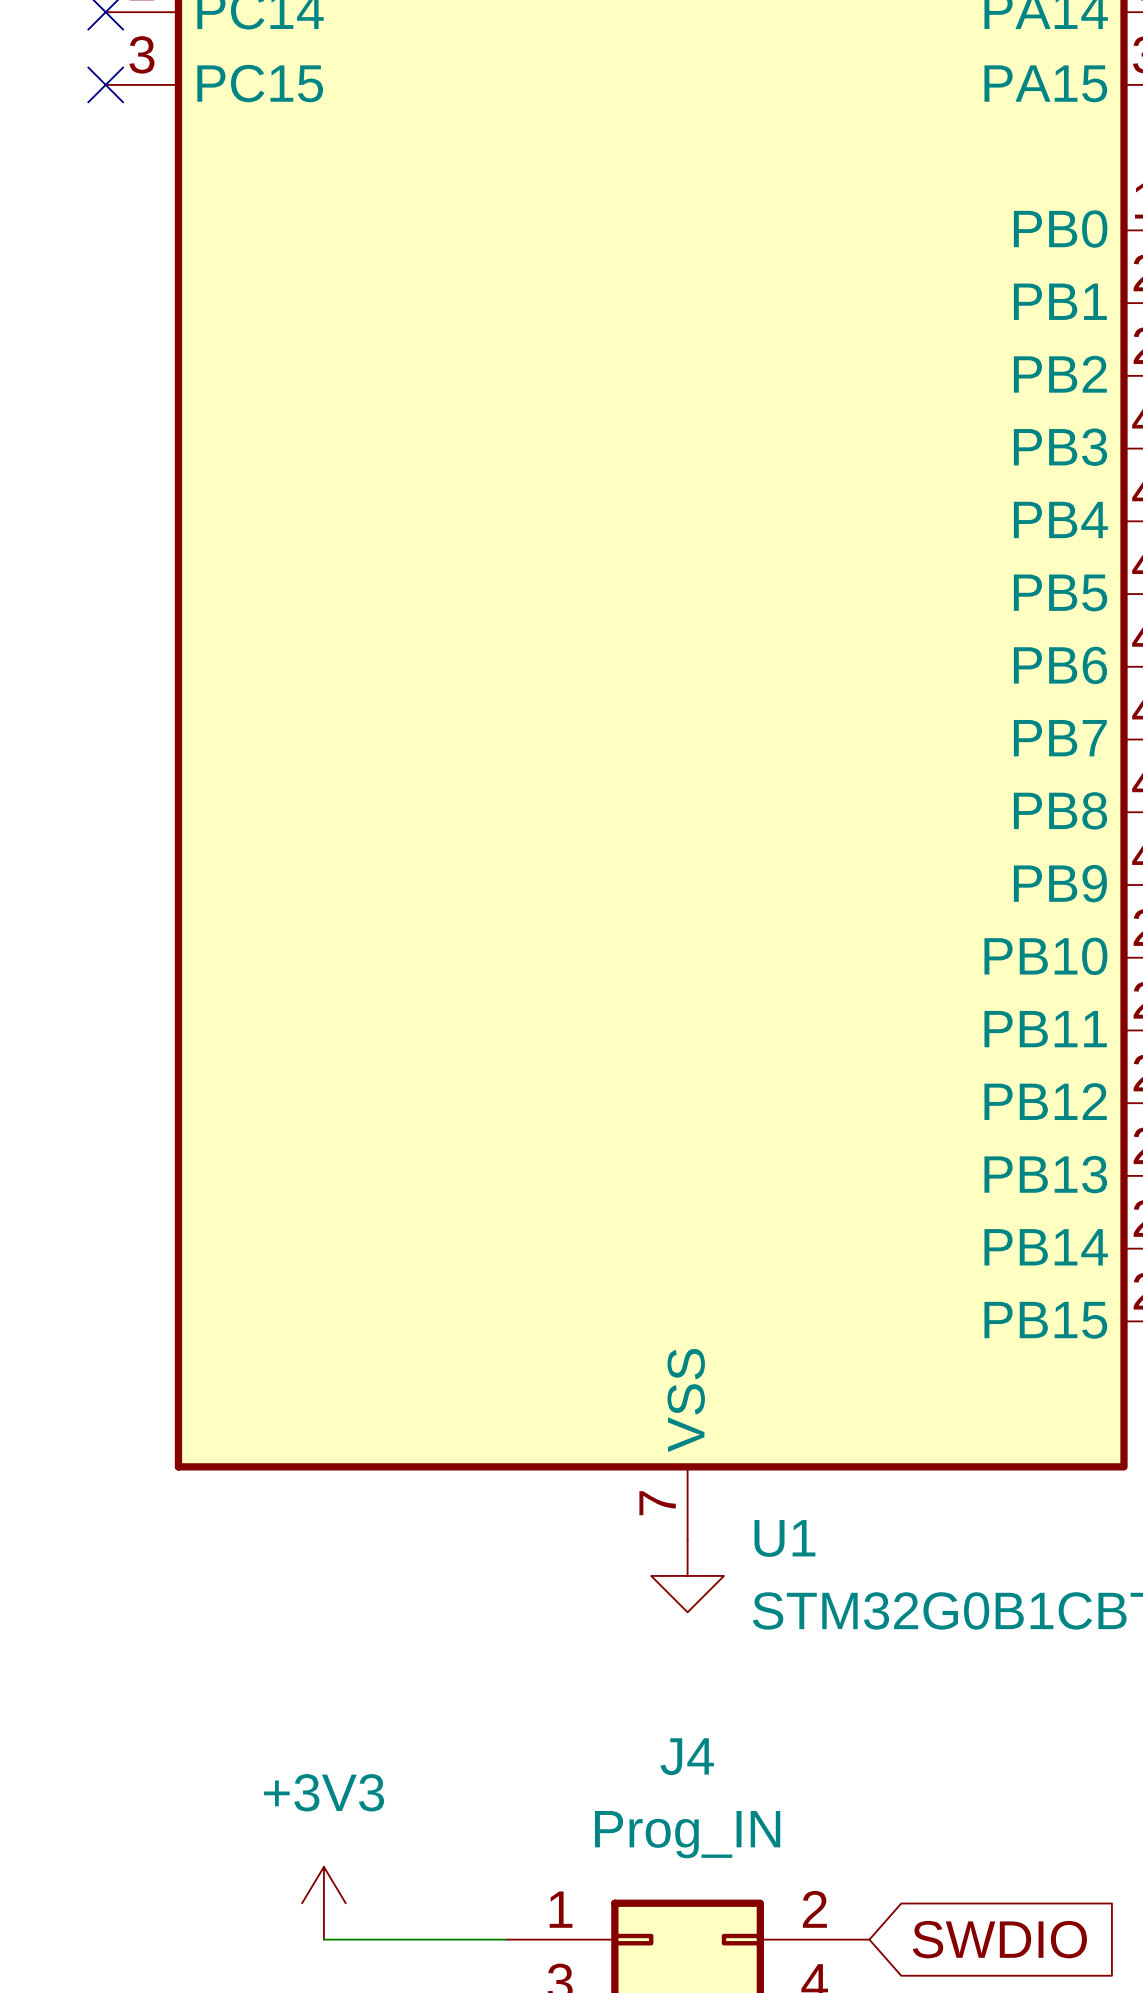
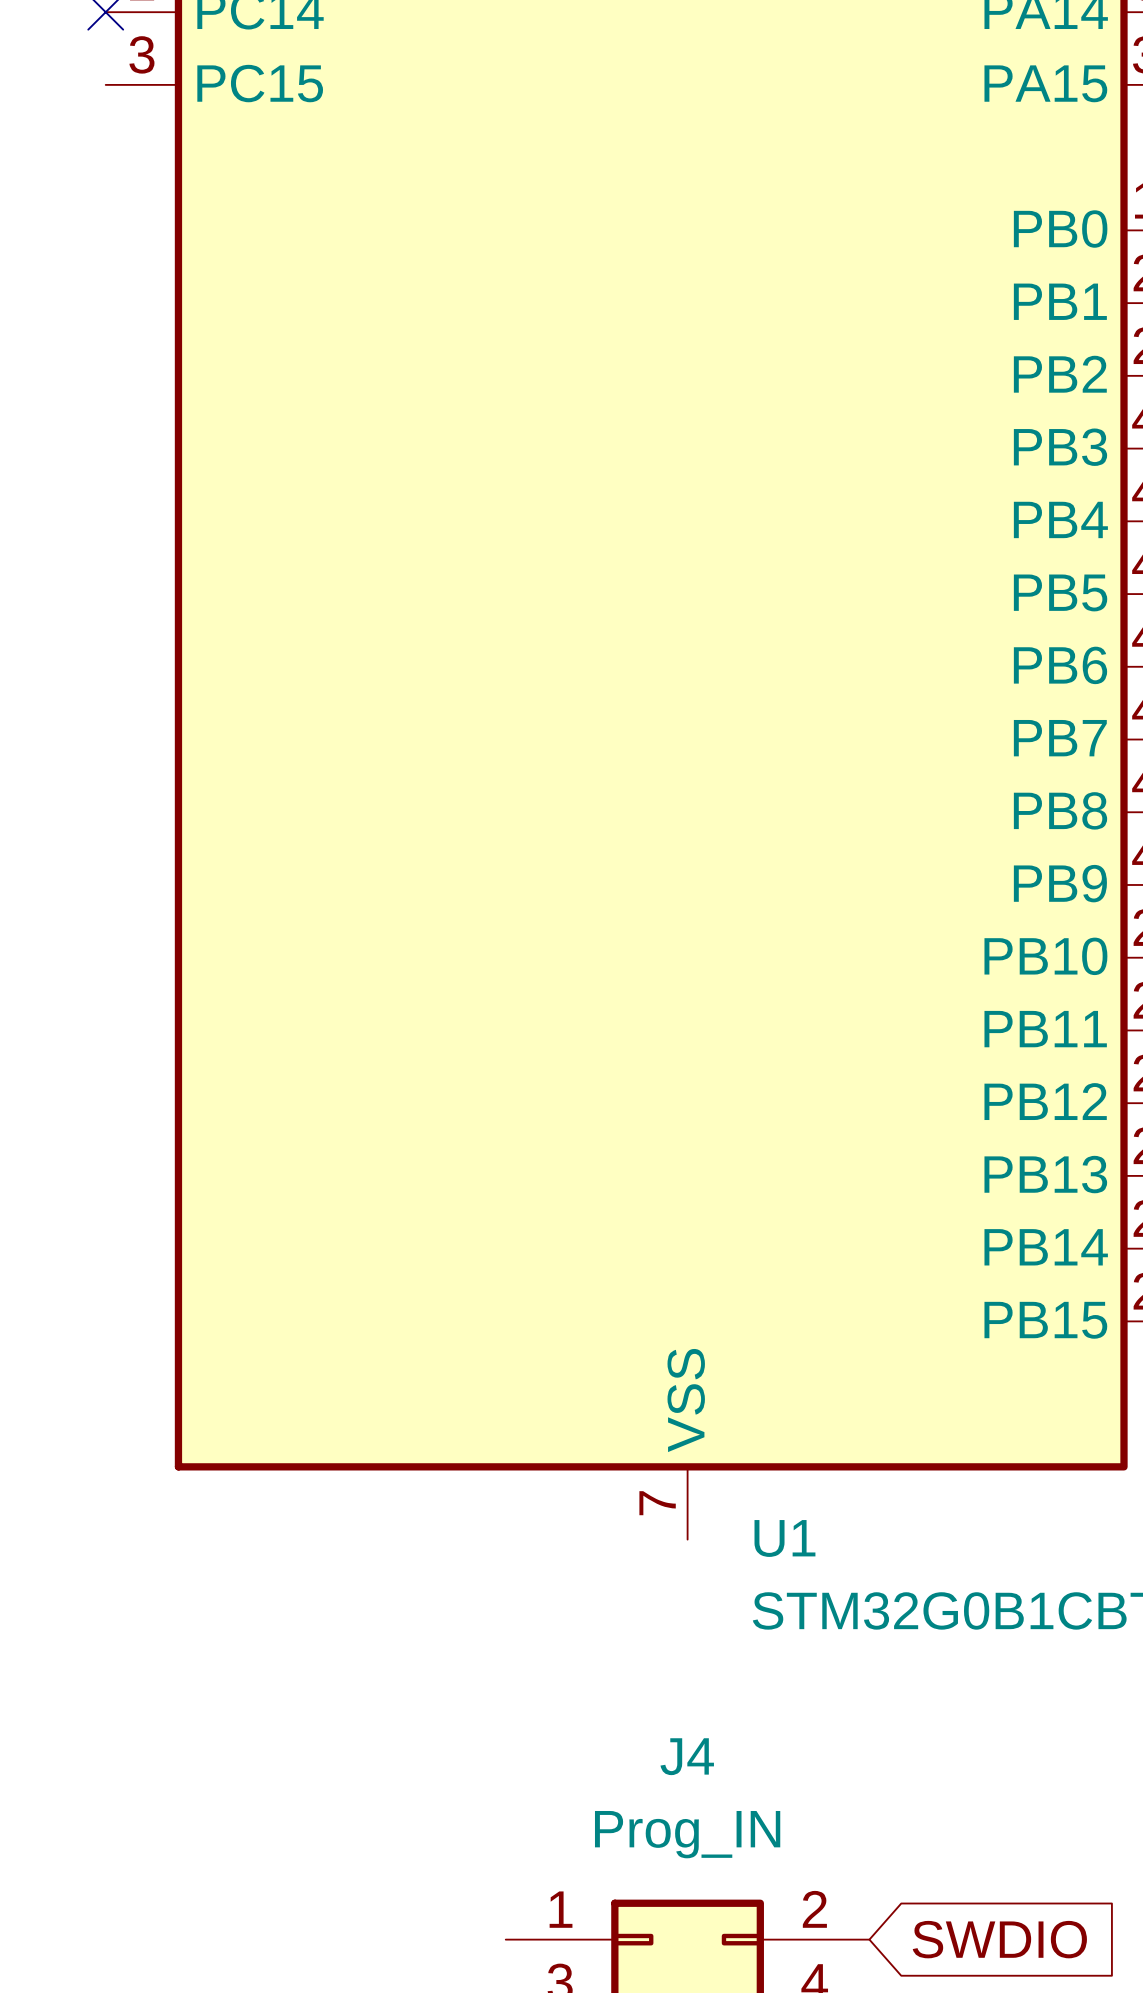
no-connect mark: (105, 84) -> none
power symbol: (687, 1575) -> none
power symbol: +3V3 (323, 1903) -> none
wire: (323, 1939) (505, 1939) -> none

